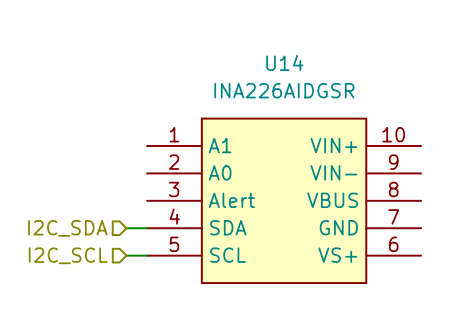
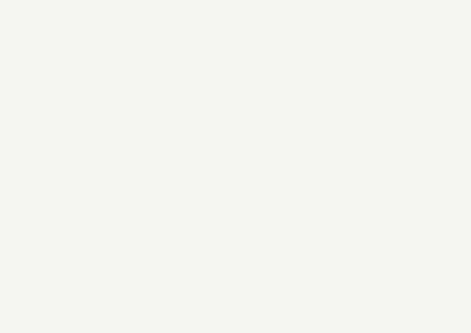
U14: INA226AIDGSR (284, 200) -> none
hierarchical label: I2C_SDA (67, 228) -> none
wire: (126, 228) (147, 228) -> none
hierarchical label: I2C_SCL (68, 255) -> none
wire: (126, 255) (147, 255) -> none

